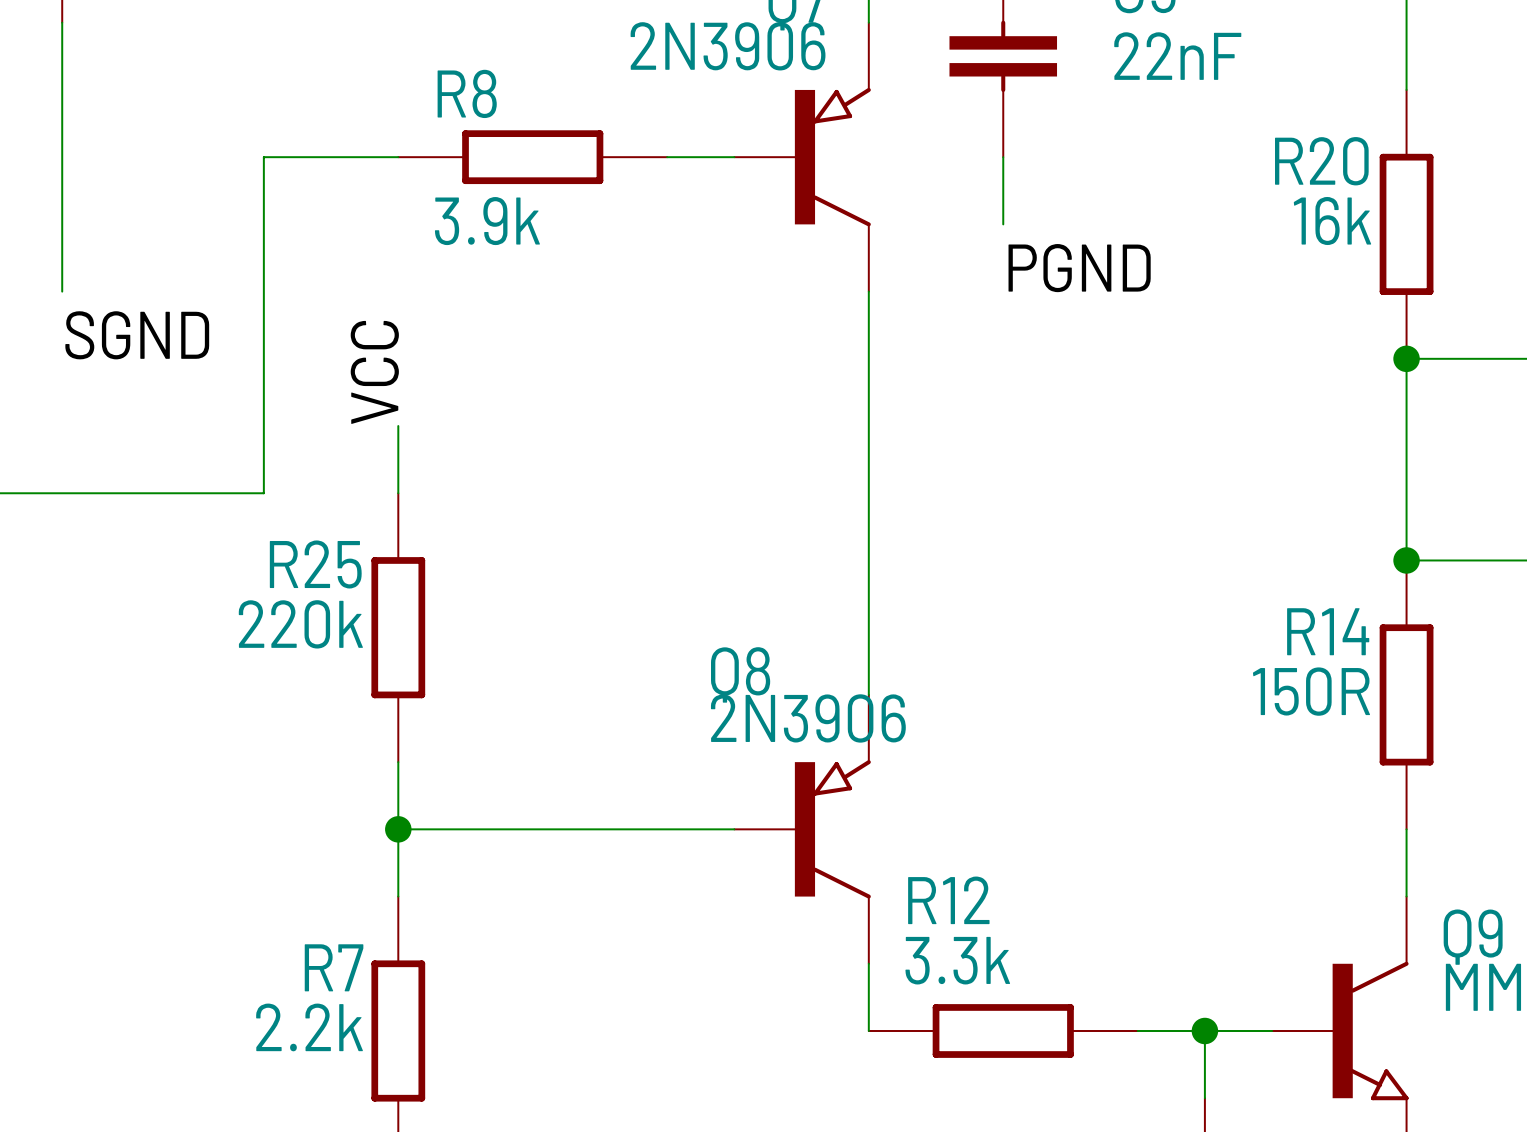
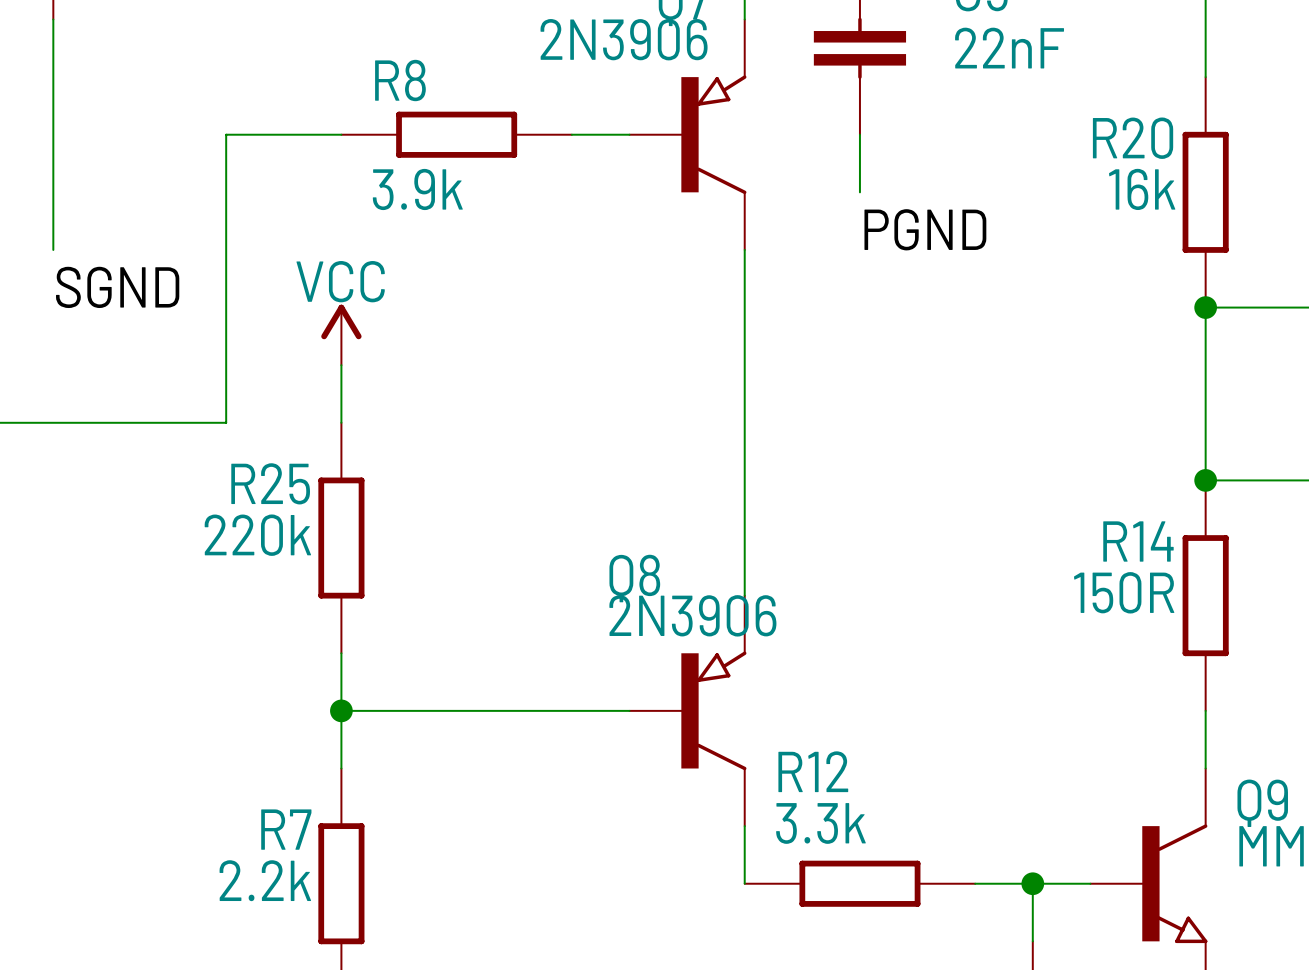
label: VCC (374, 372) -> none
power symbol: none -> VCC (341, 334)

